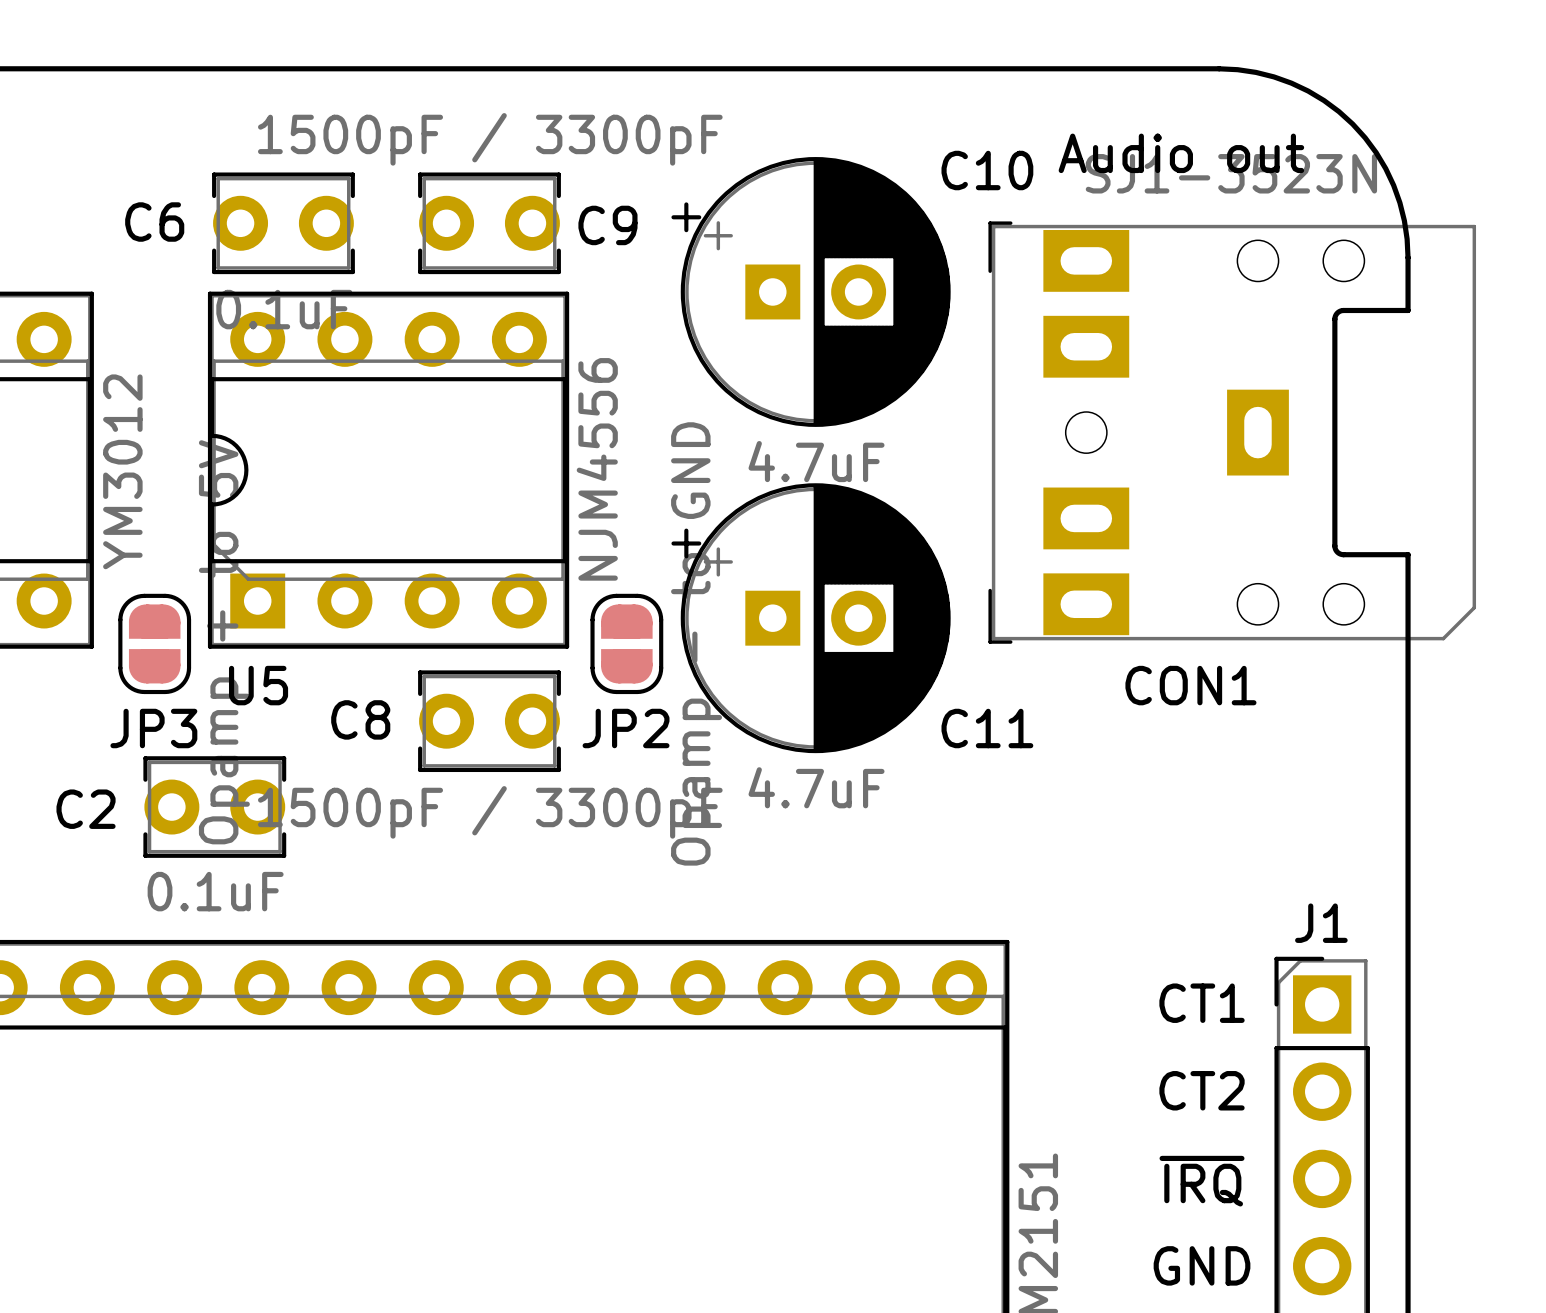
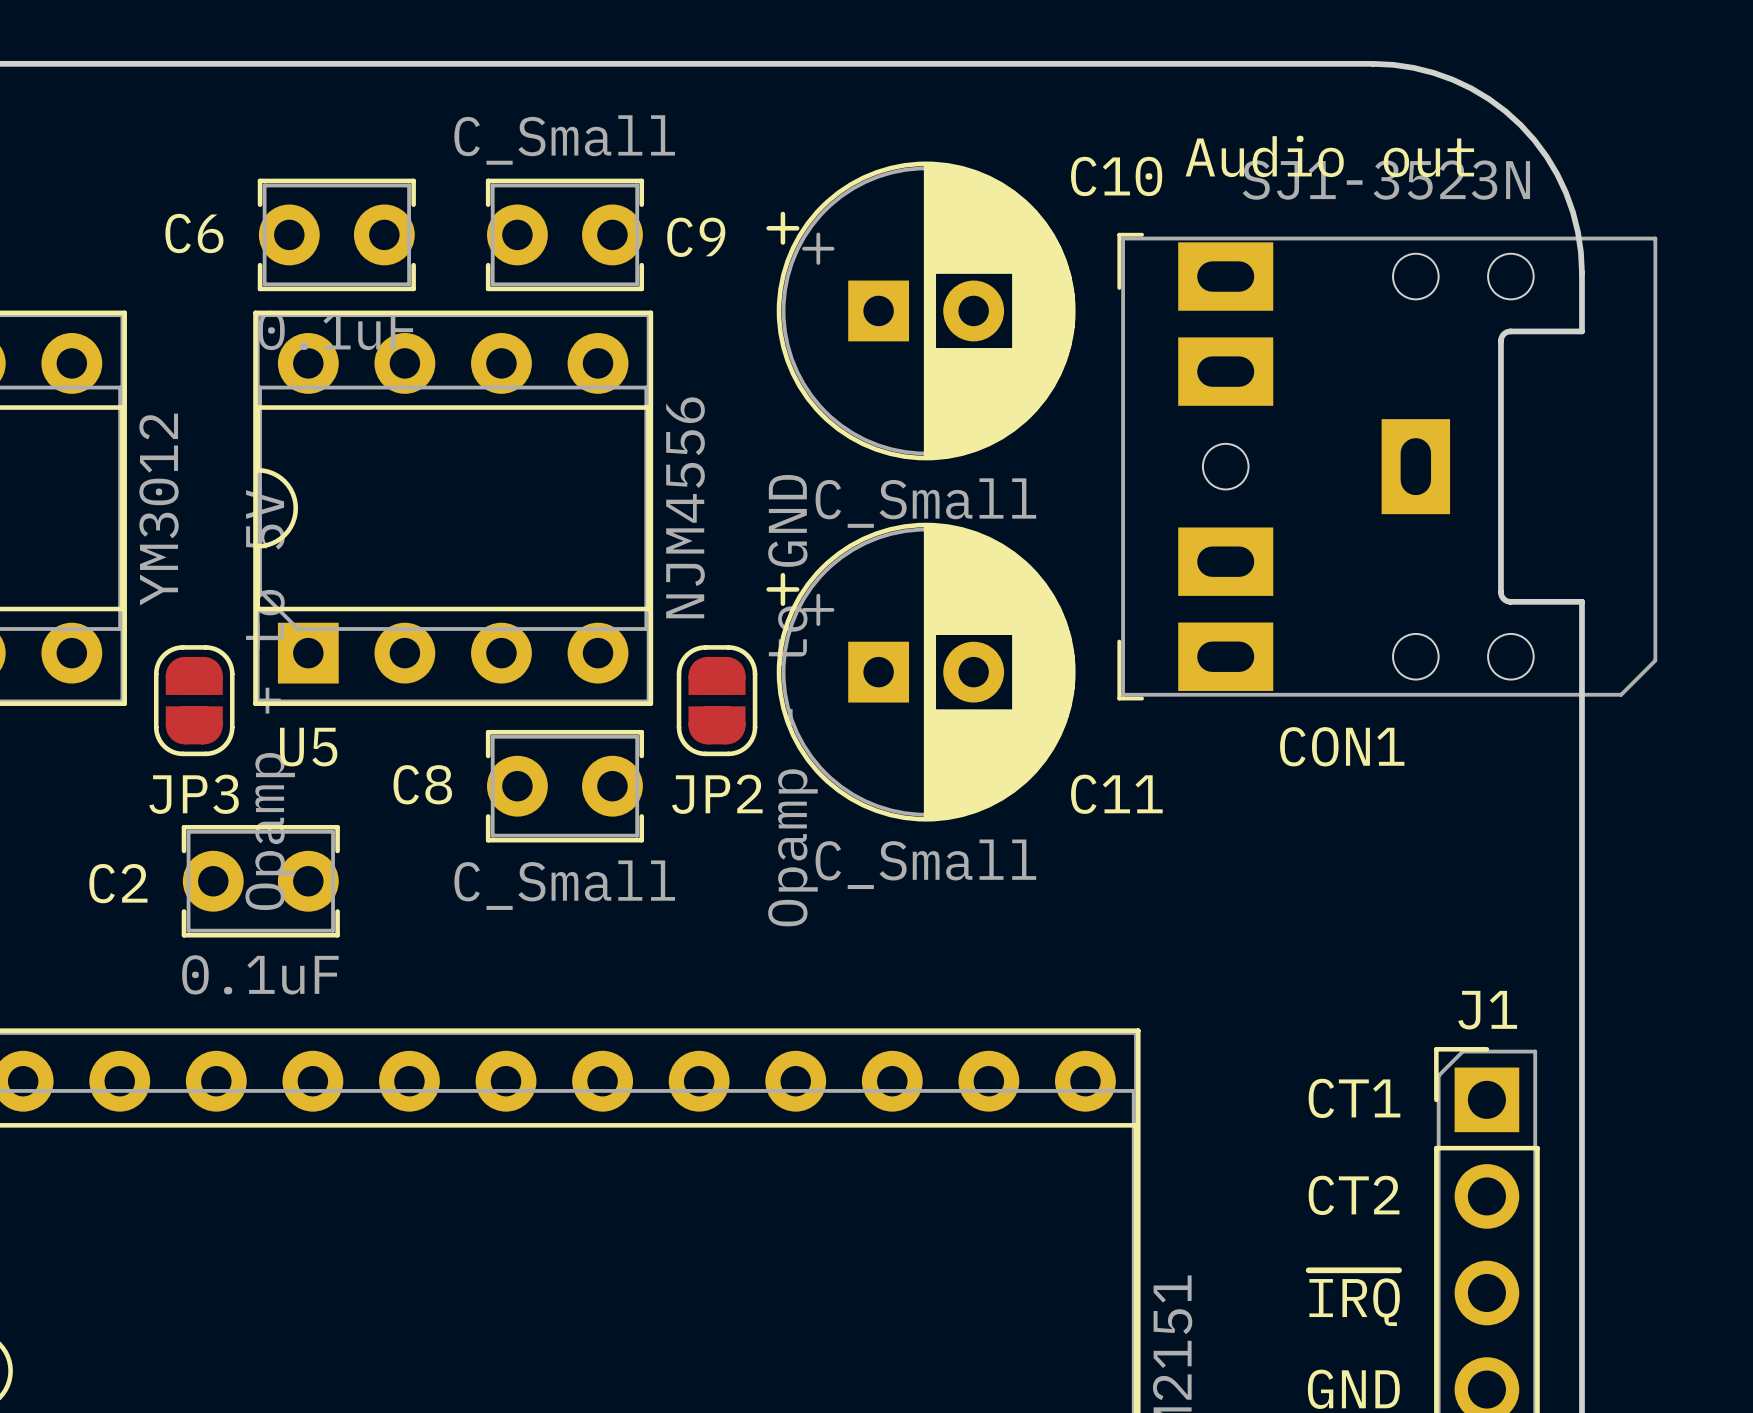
C9 value: 1500pF / 3300pF (490, 139) -> C_Small (564, 140)
C10 value: 4.7uF (816, 461) -> C_Small (925, 503)
C11 value: 4.7uF (816, 787) -> C_Small (925, 864)
C8 value: 1500pF / 3300pF (490, 812) -> C_Small (564, 885)

